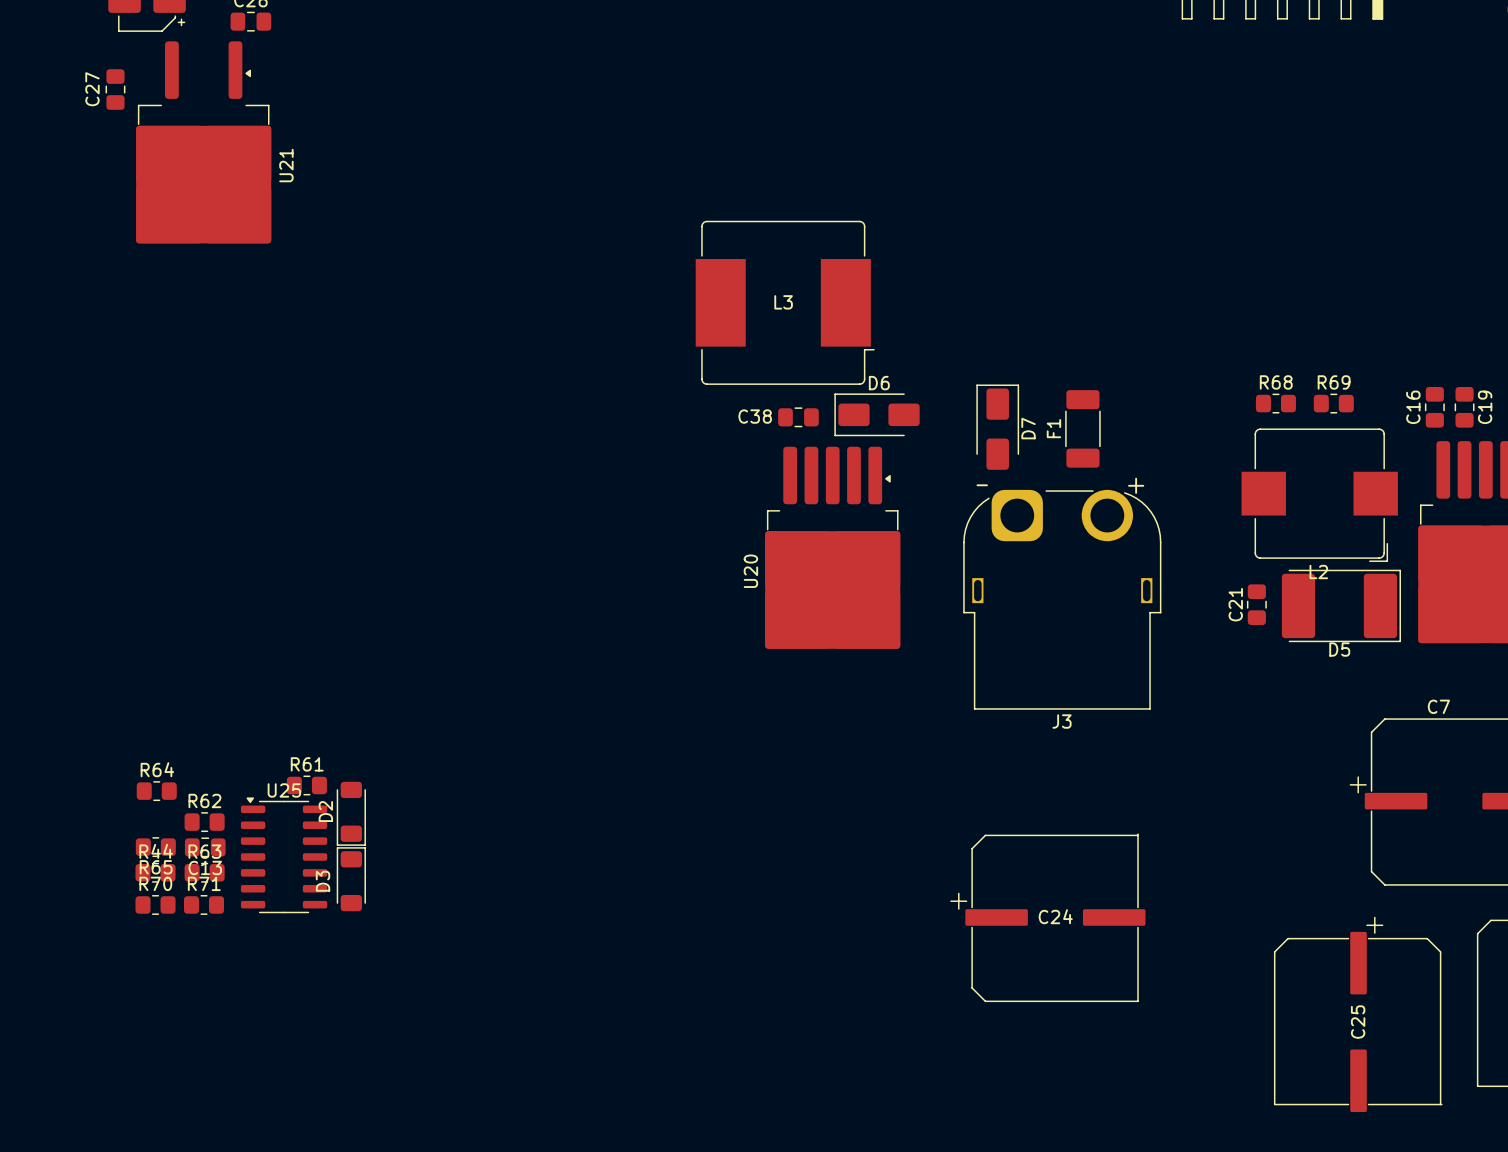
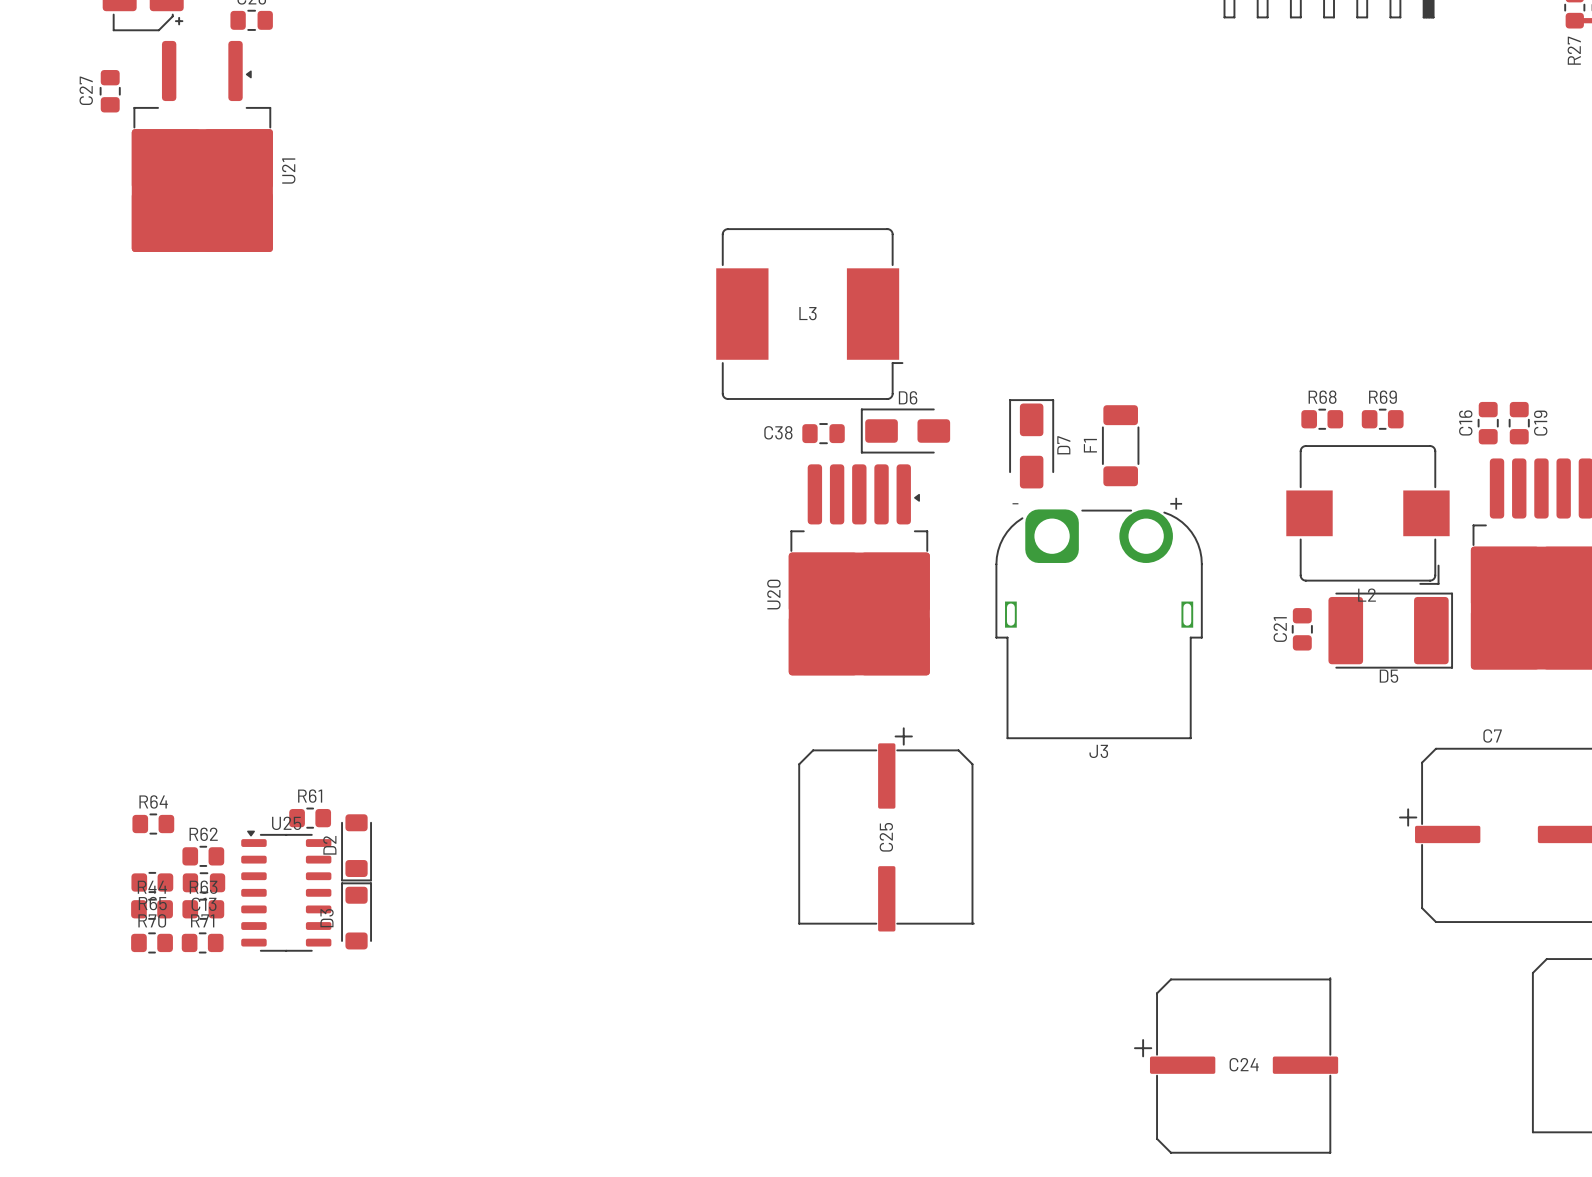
C24 position: (1047, 917) -> (1236, 1065)
C25 position: (1358, 1014) -> (886, 829)

